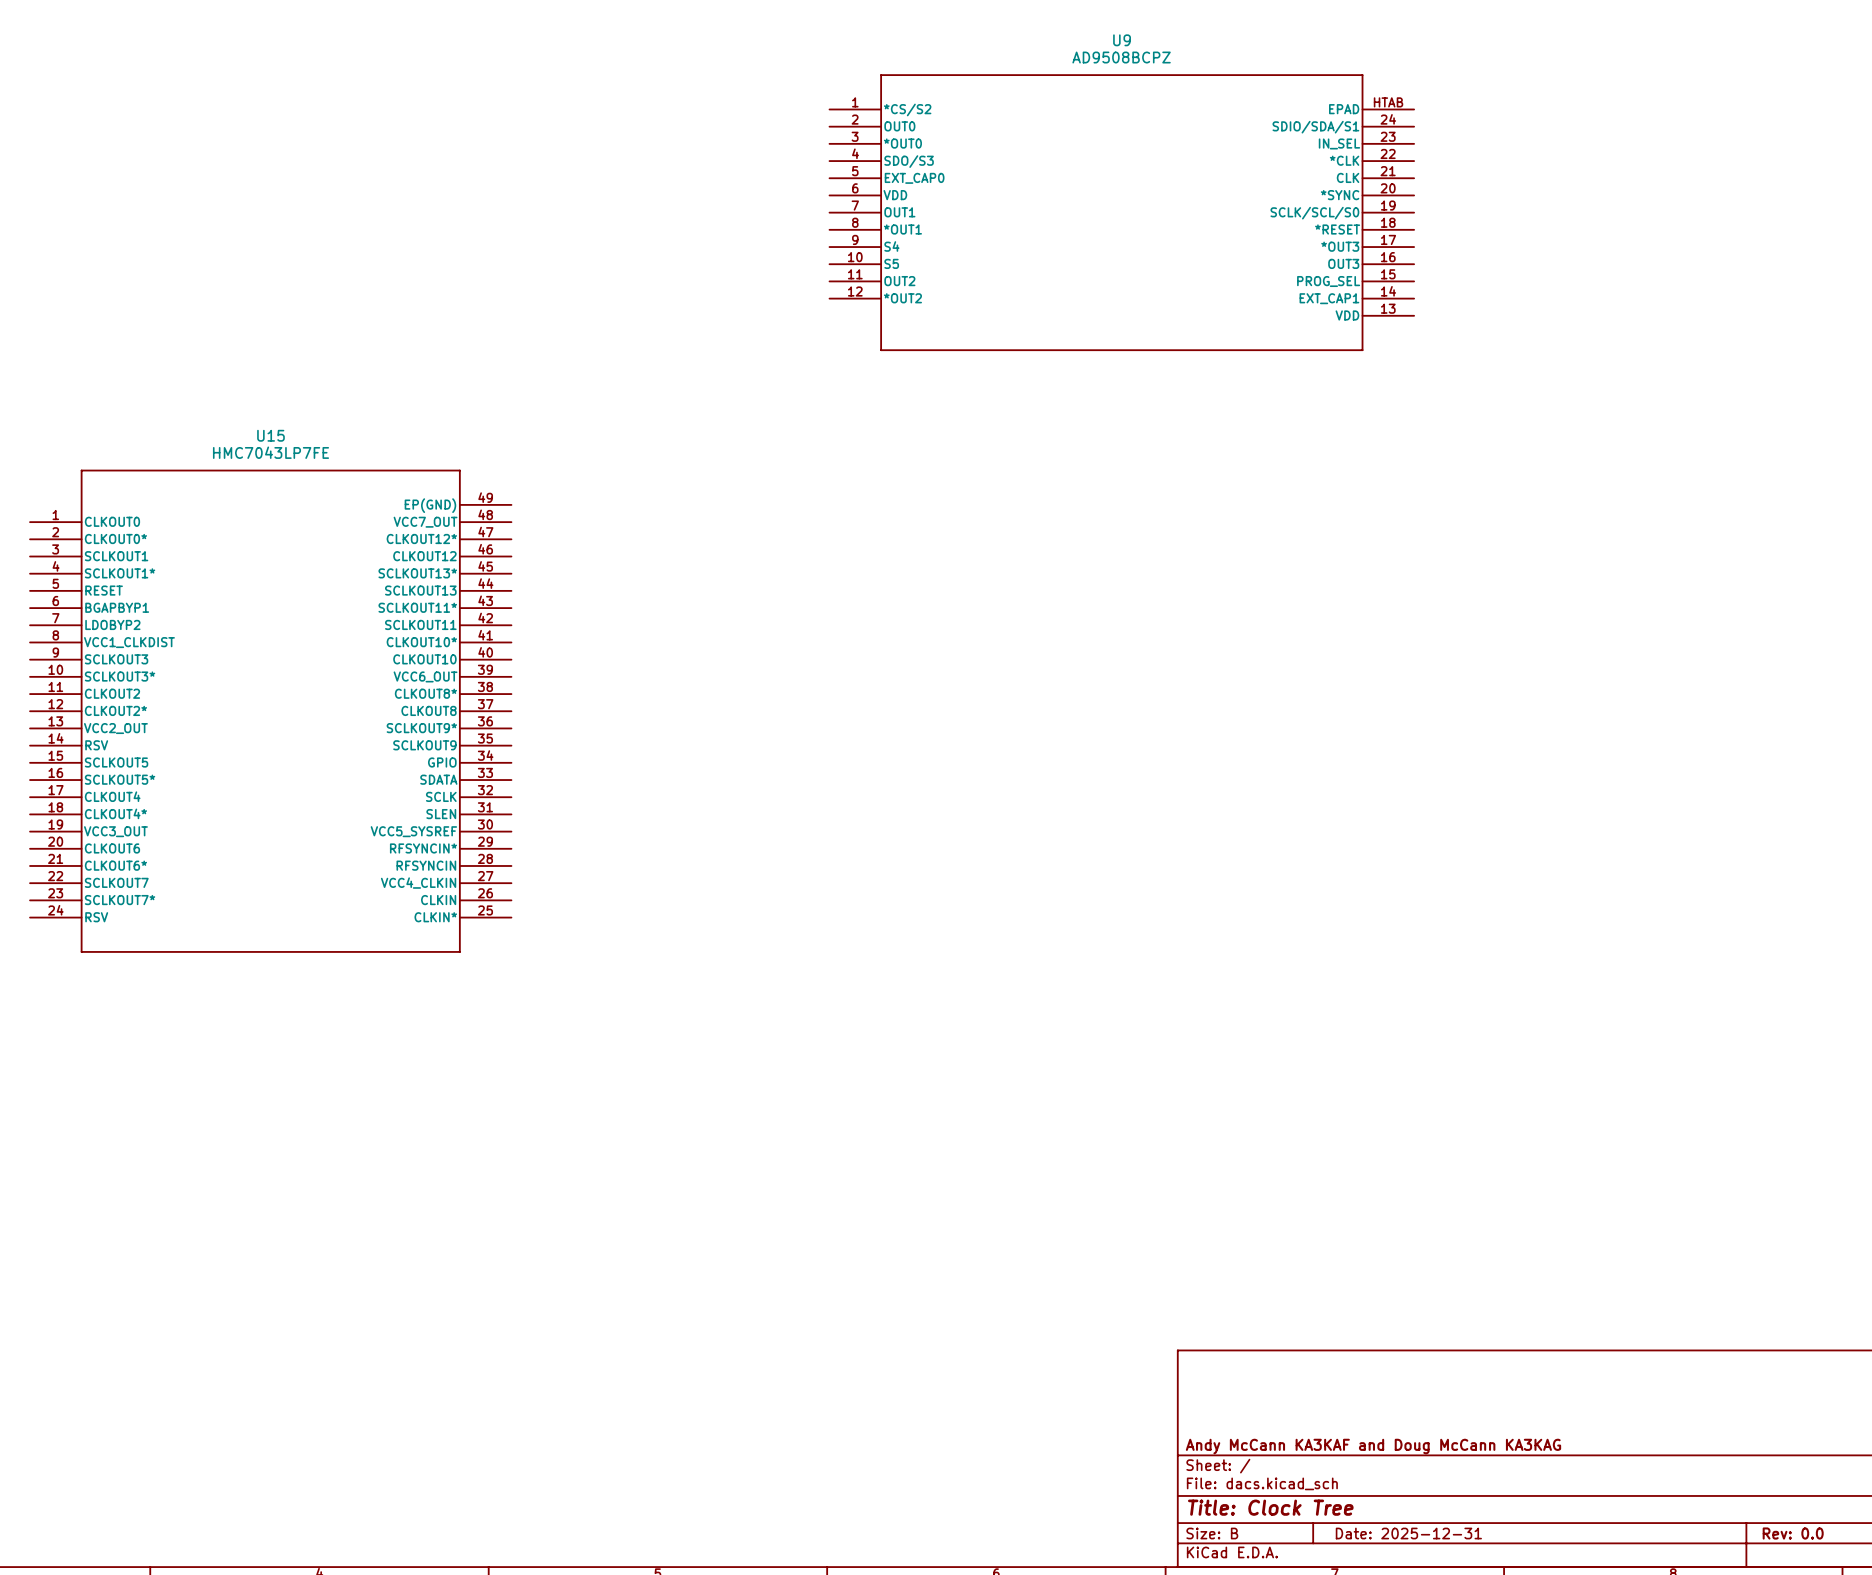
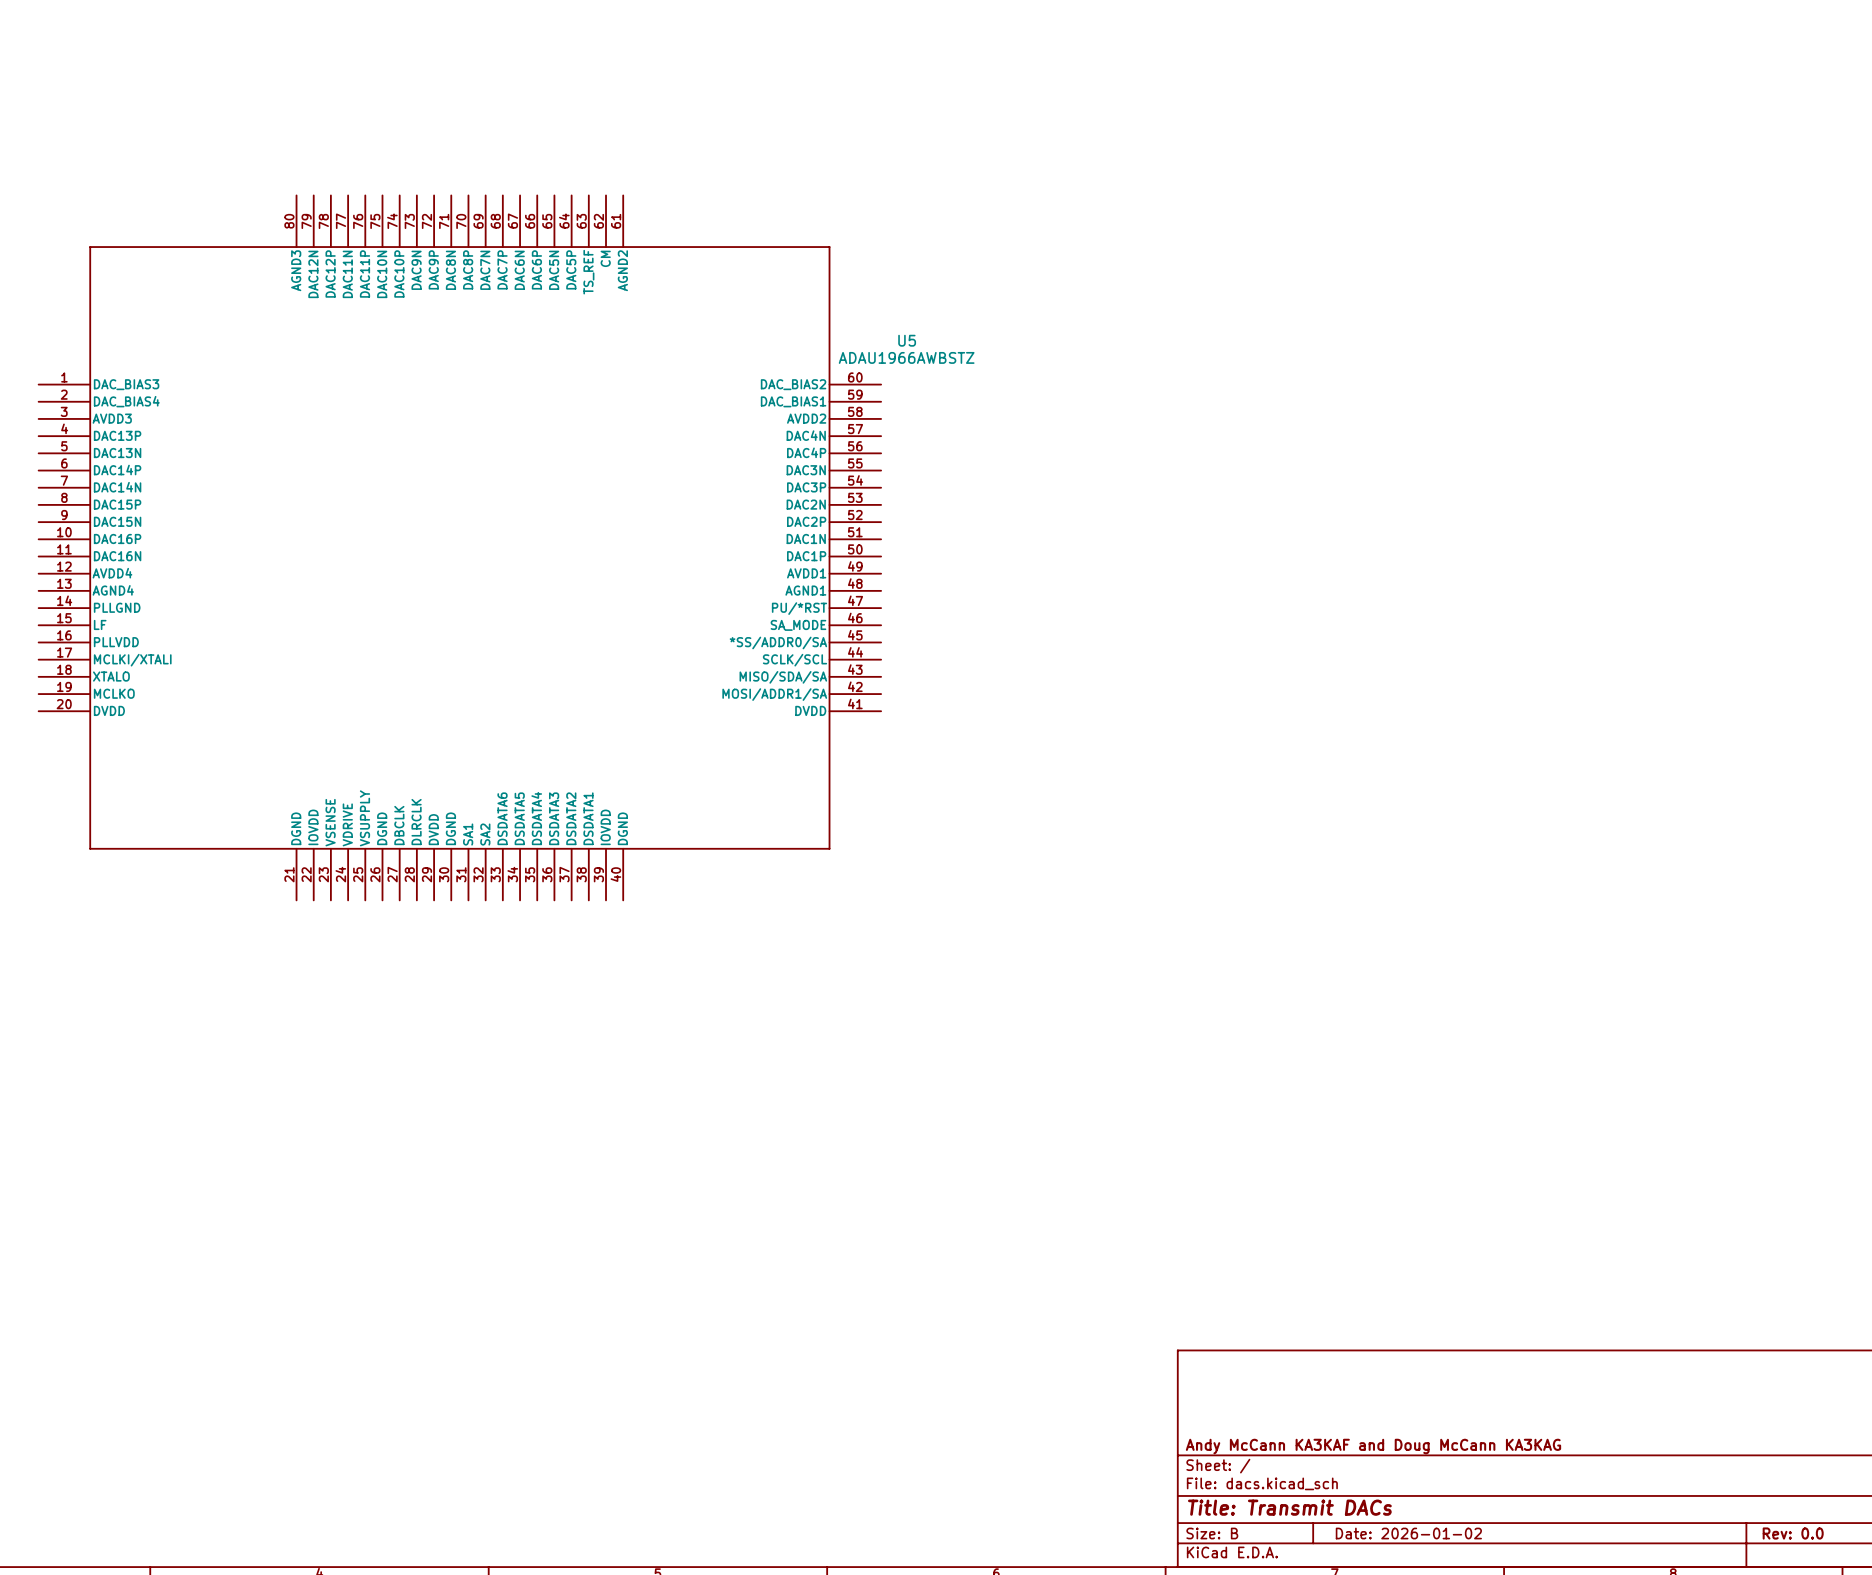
U9: AD9508BCPZ (1121, 212) -> none
U5: none -> ADAU1966AWBSTZ (459, 547)
U15: HMC7043LP7FE (270, 711) -> none
title block: Title: Clock Tree (1270, 1507) -> Title: Transmit DACs (1289, 1507)
title block: Date: 2025-12-31 (1408, 1533) -> Date: 2026-01-02 (1408, 1533)

